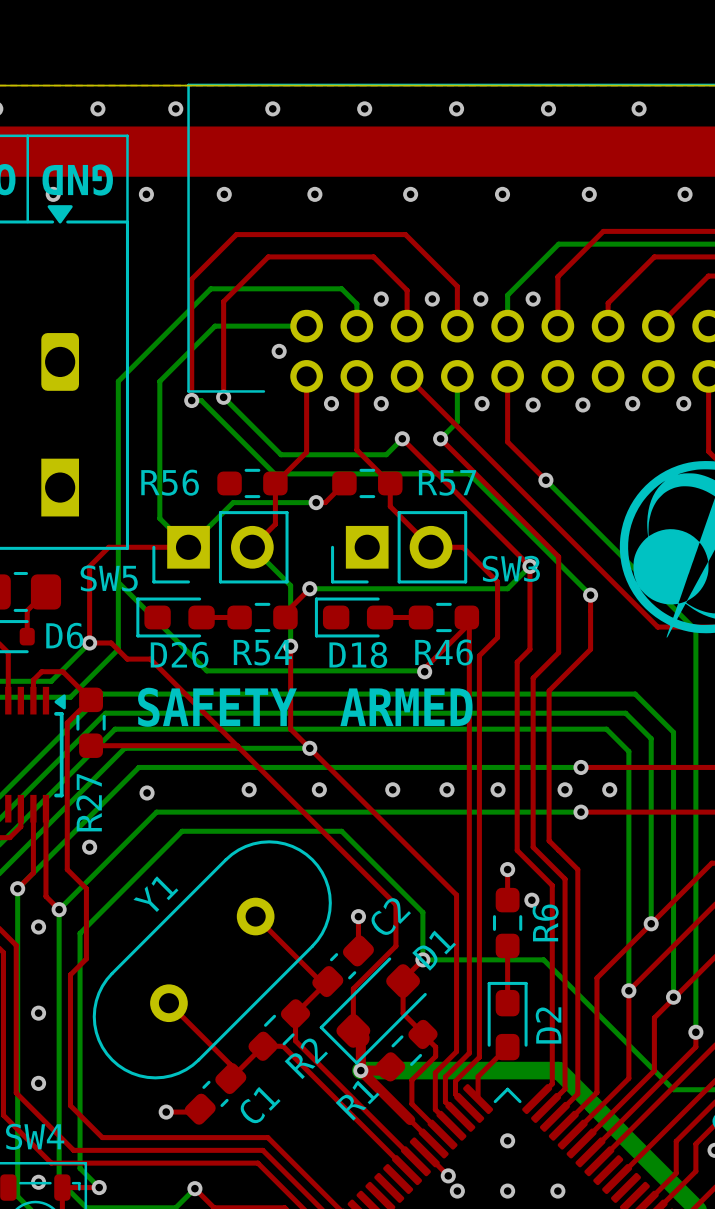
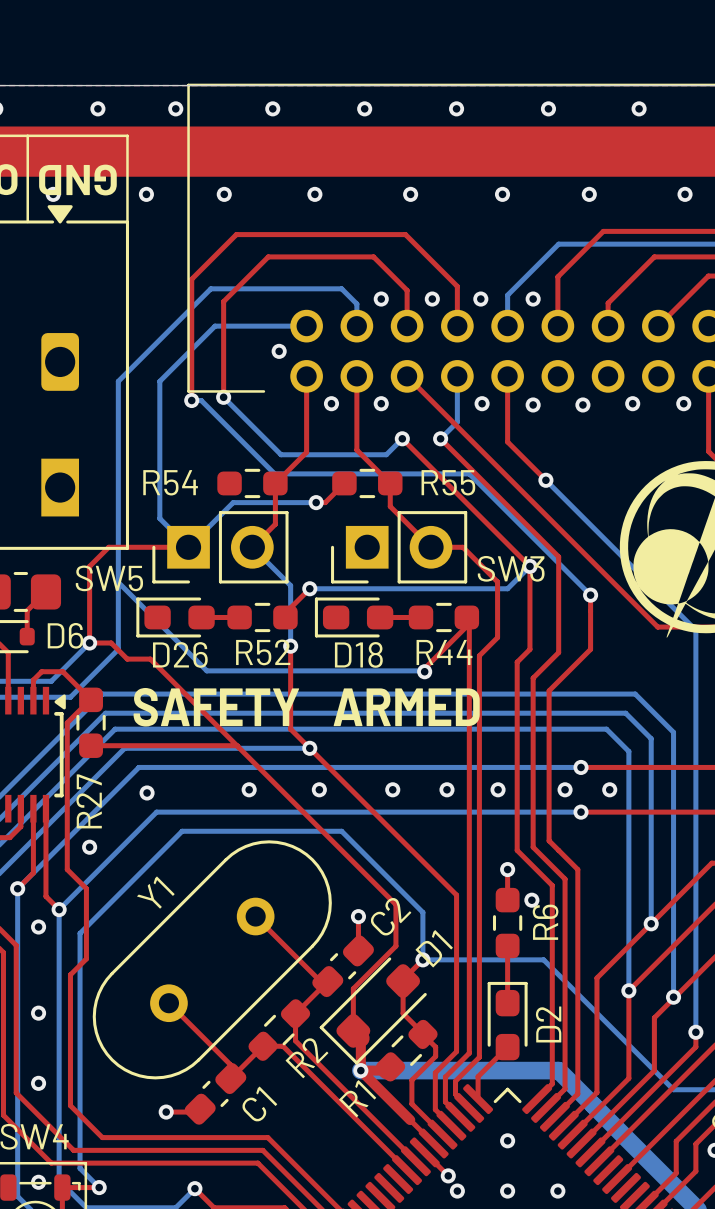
R56 name: R56 (170, 482) -> R54 (170, 482)
R57 name: R57 (447, 482) -> R55 (448, 482)
R54 name: R54 (262, 652) -> R52 (263, 652)
R46 name: R46 (444, 652) -> R44 (444, 652)

